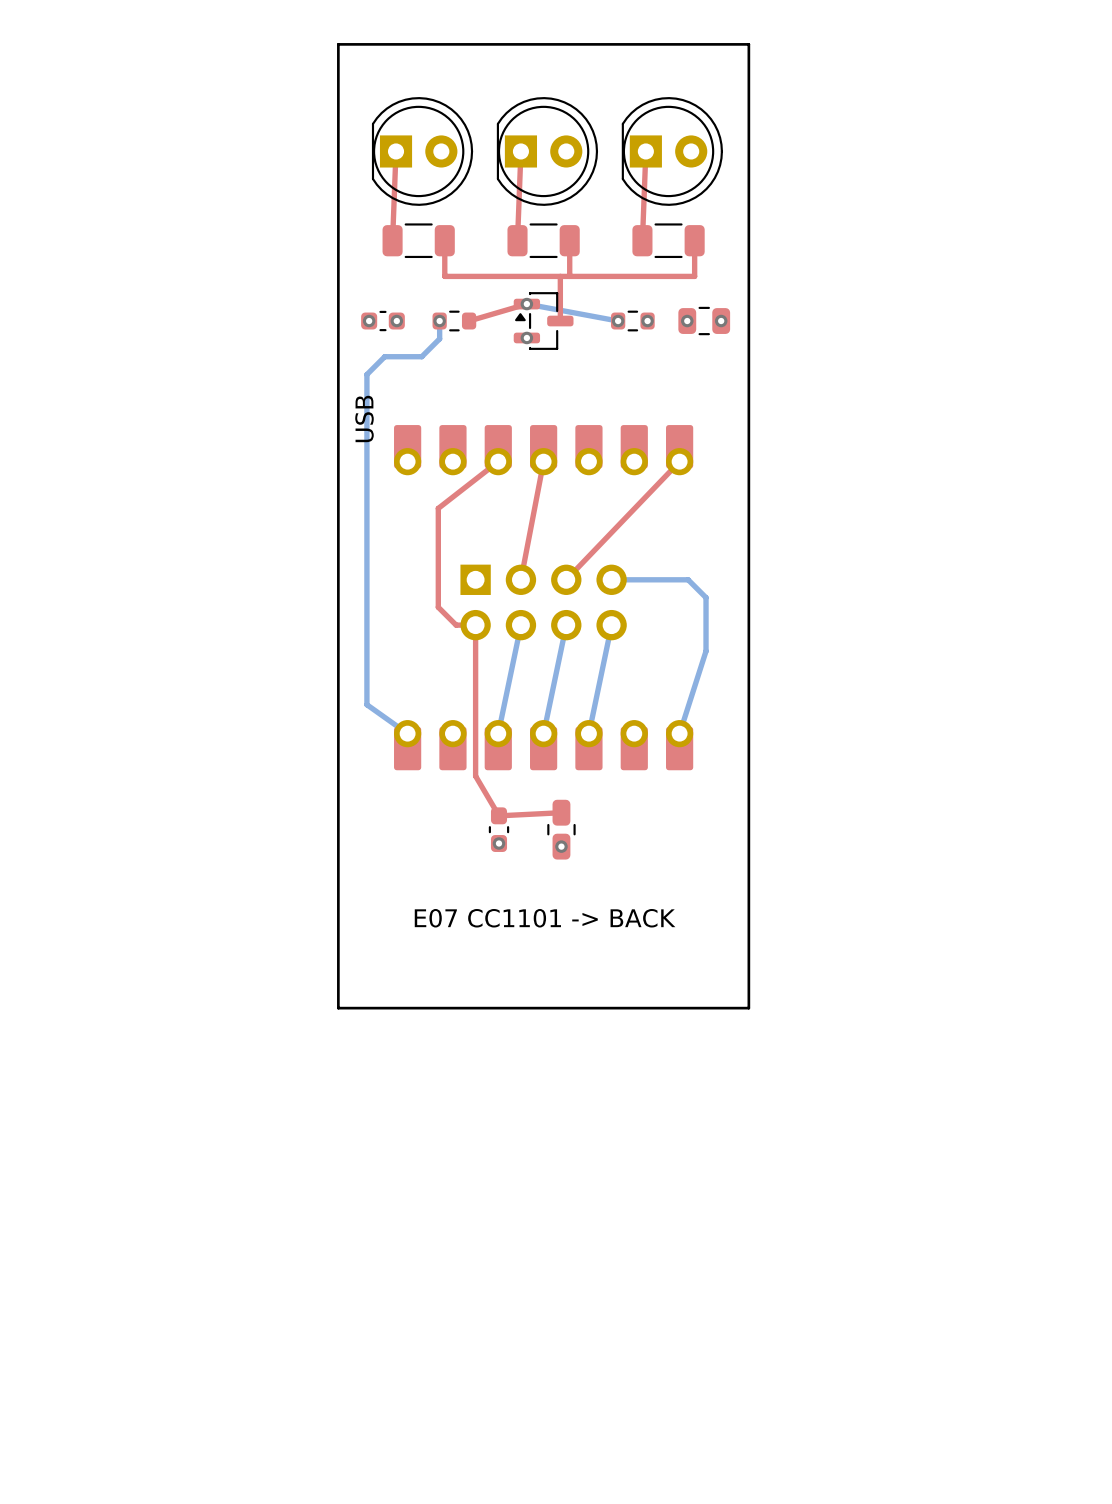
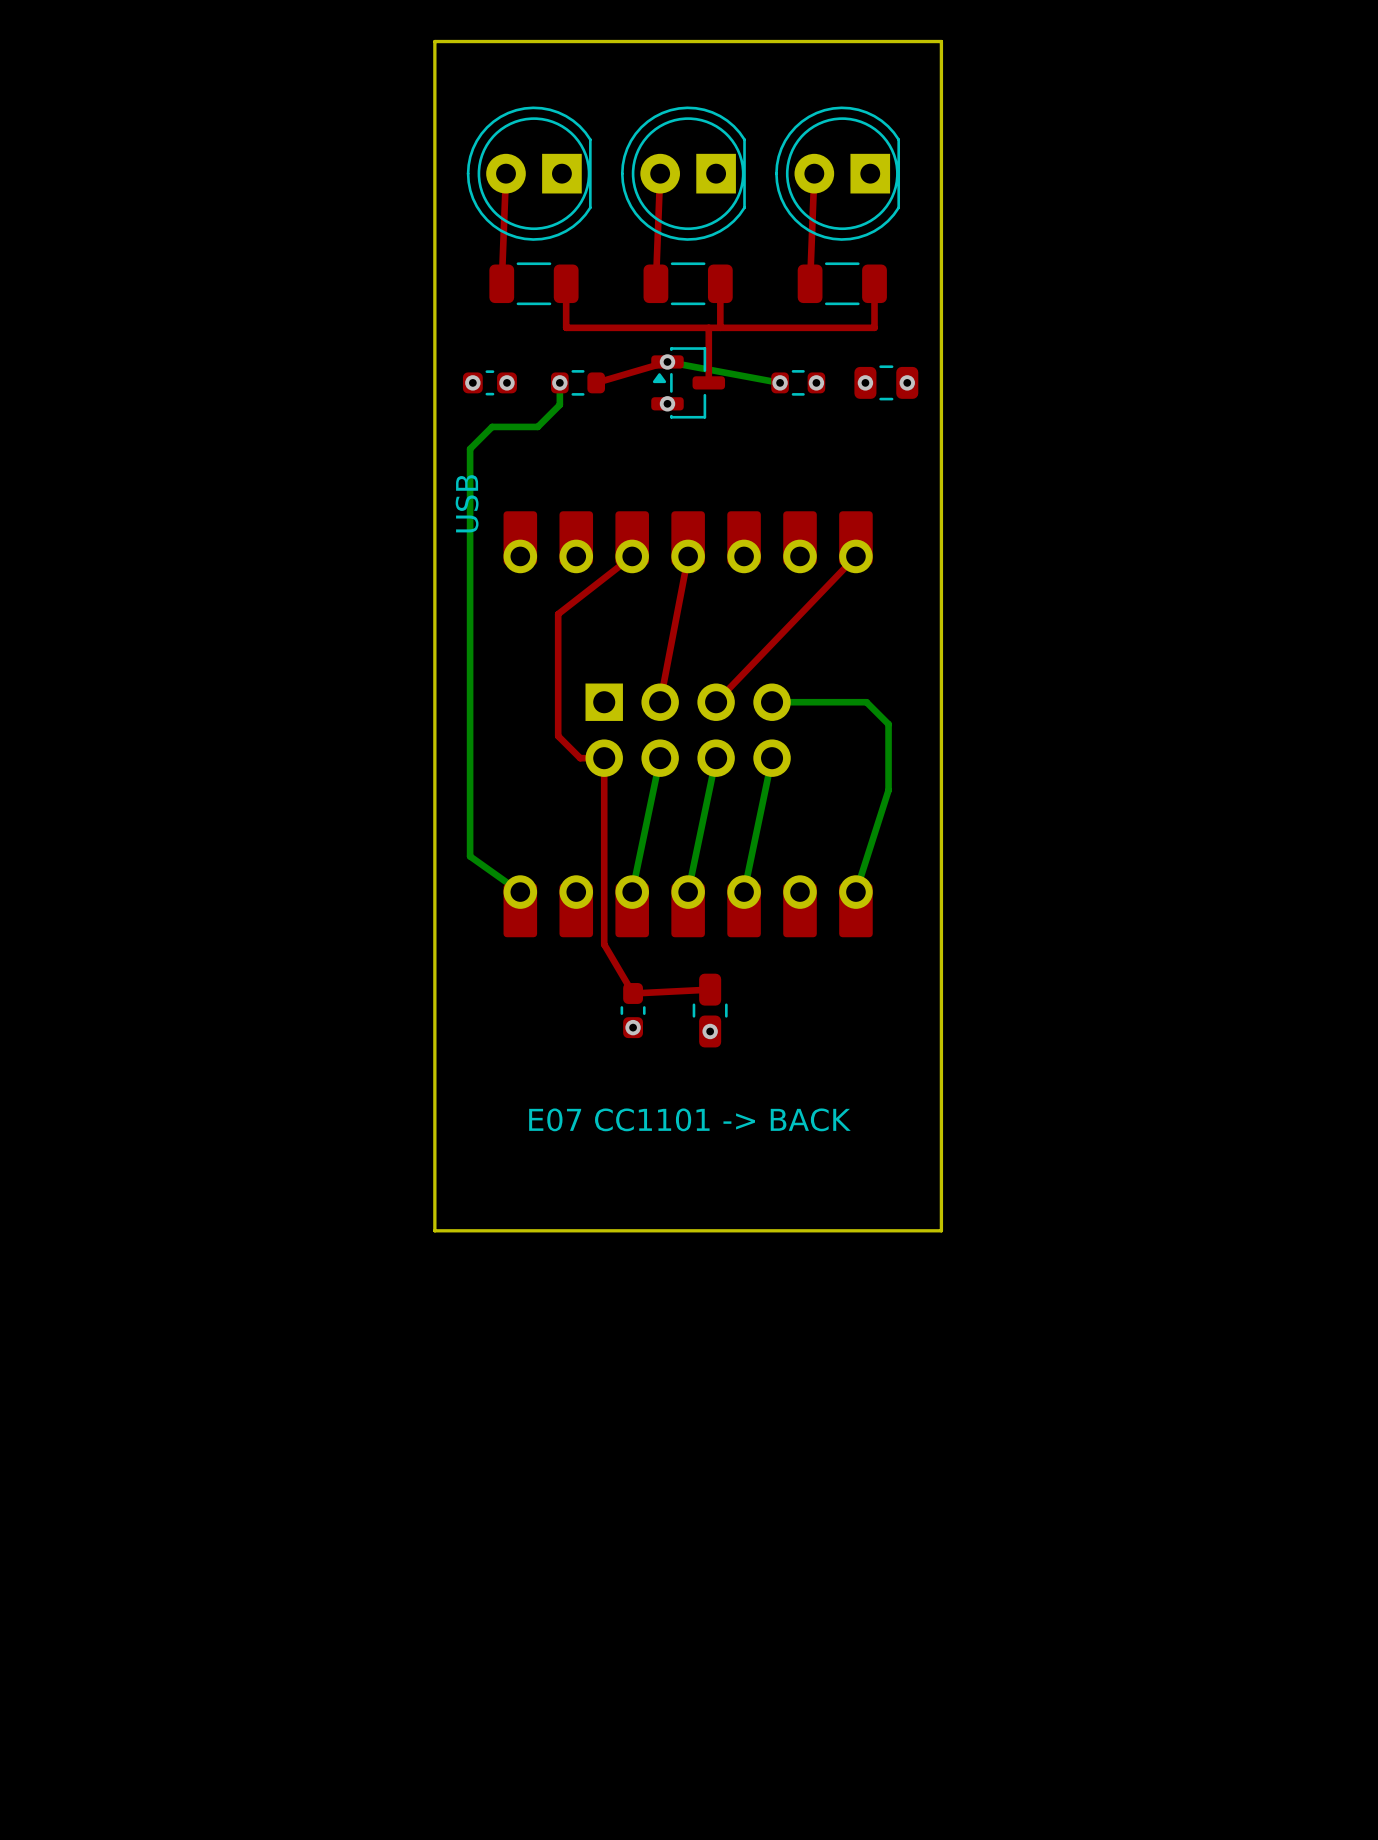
part rotation: 0° (422, 151) -> 180° (529, 173)
part rotation: 0° (547, 151) -> 180° (683, 173)
part rotation: 0° (672, 151) -> 180° (837, 173)

